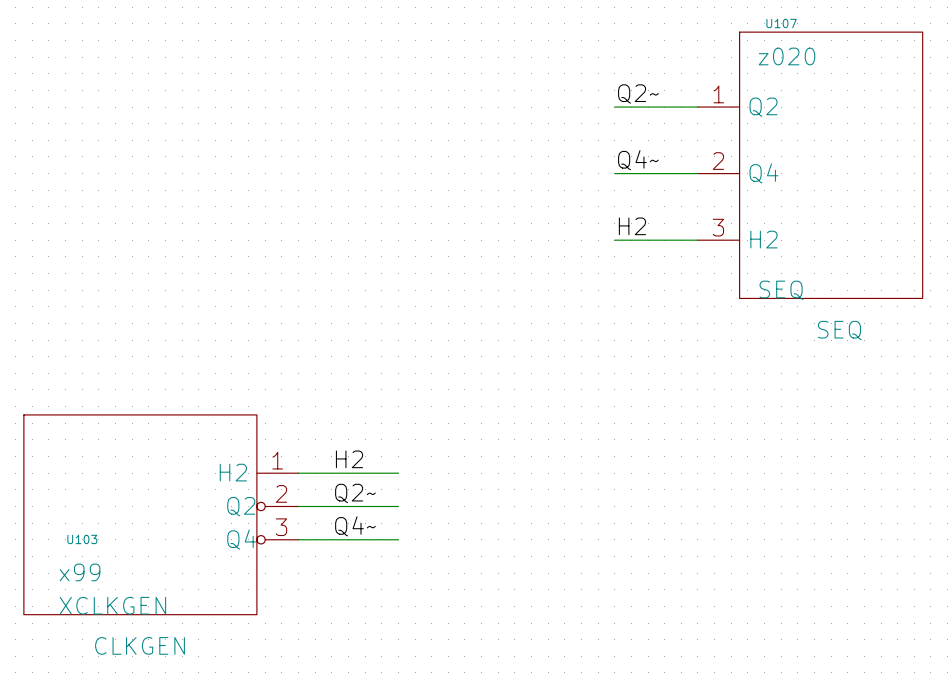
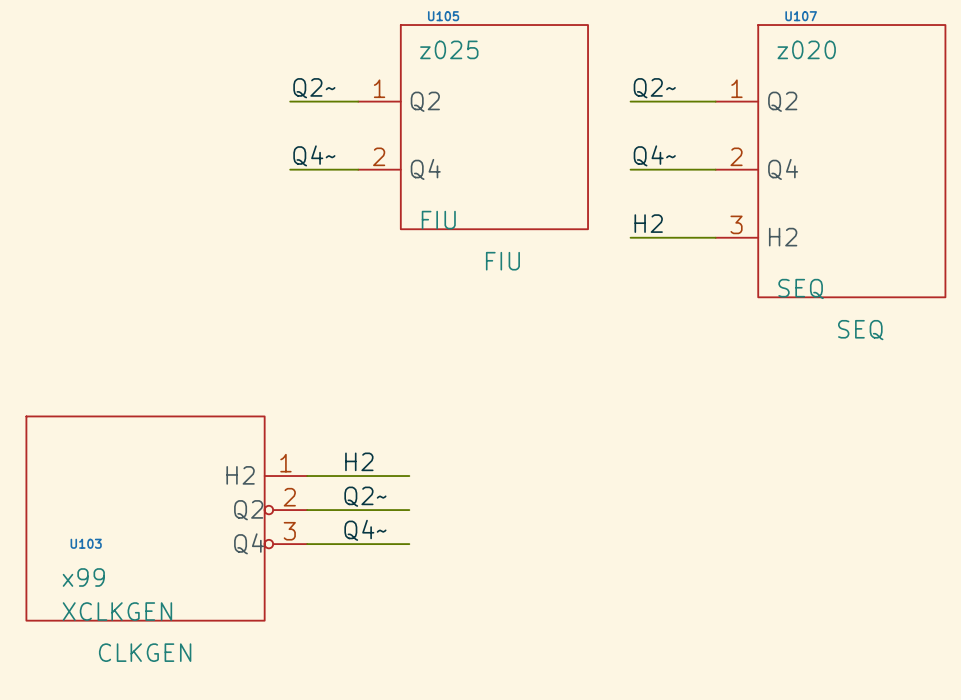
label: none -> Q2~ (314, 88)
wire: none -> (290, 101) (358, 101)
U105: none -> FIU (473, 127)
label: none -> Q4~ (314, 155)
wire: none -> (290, 169) (358, 169)

